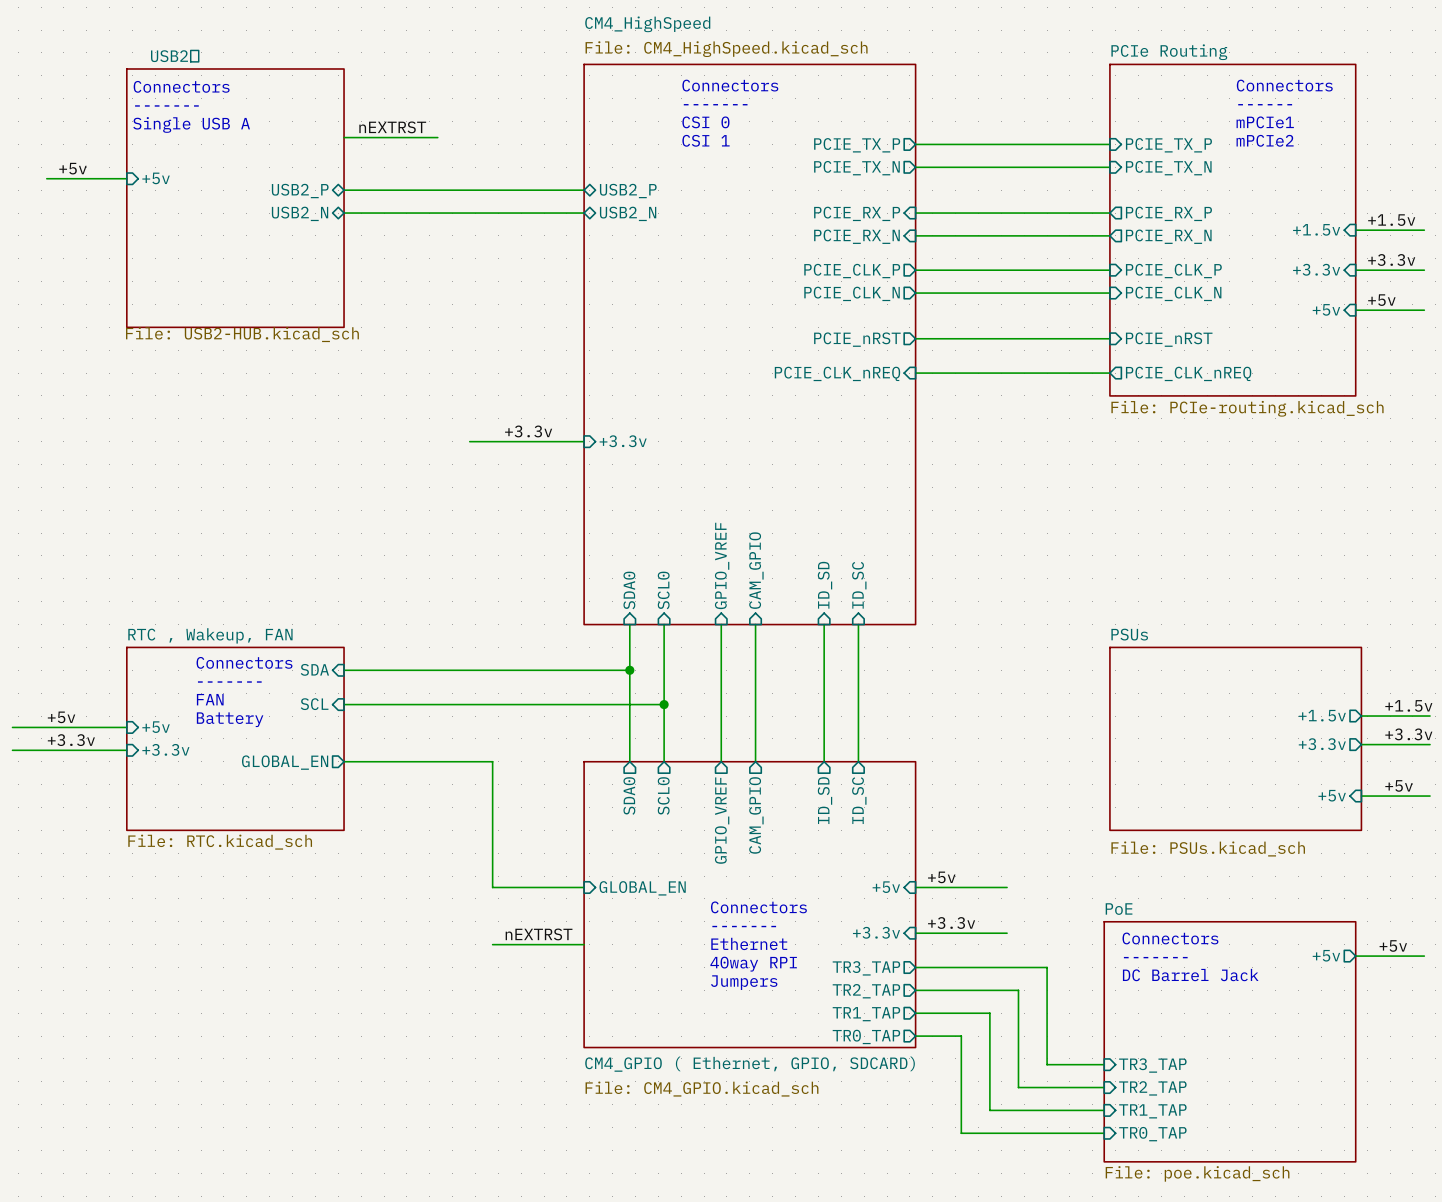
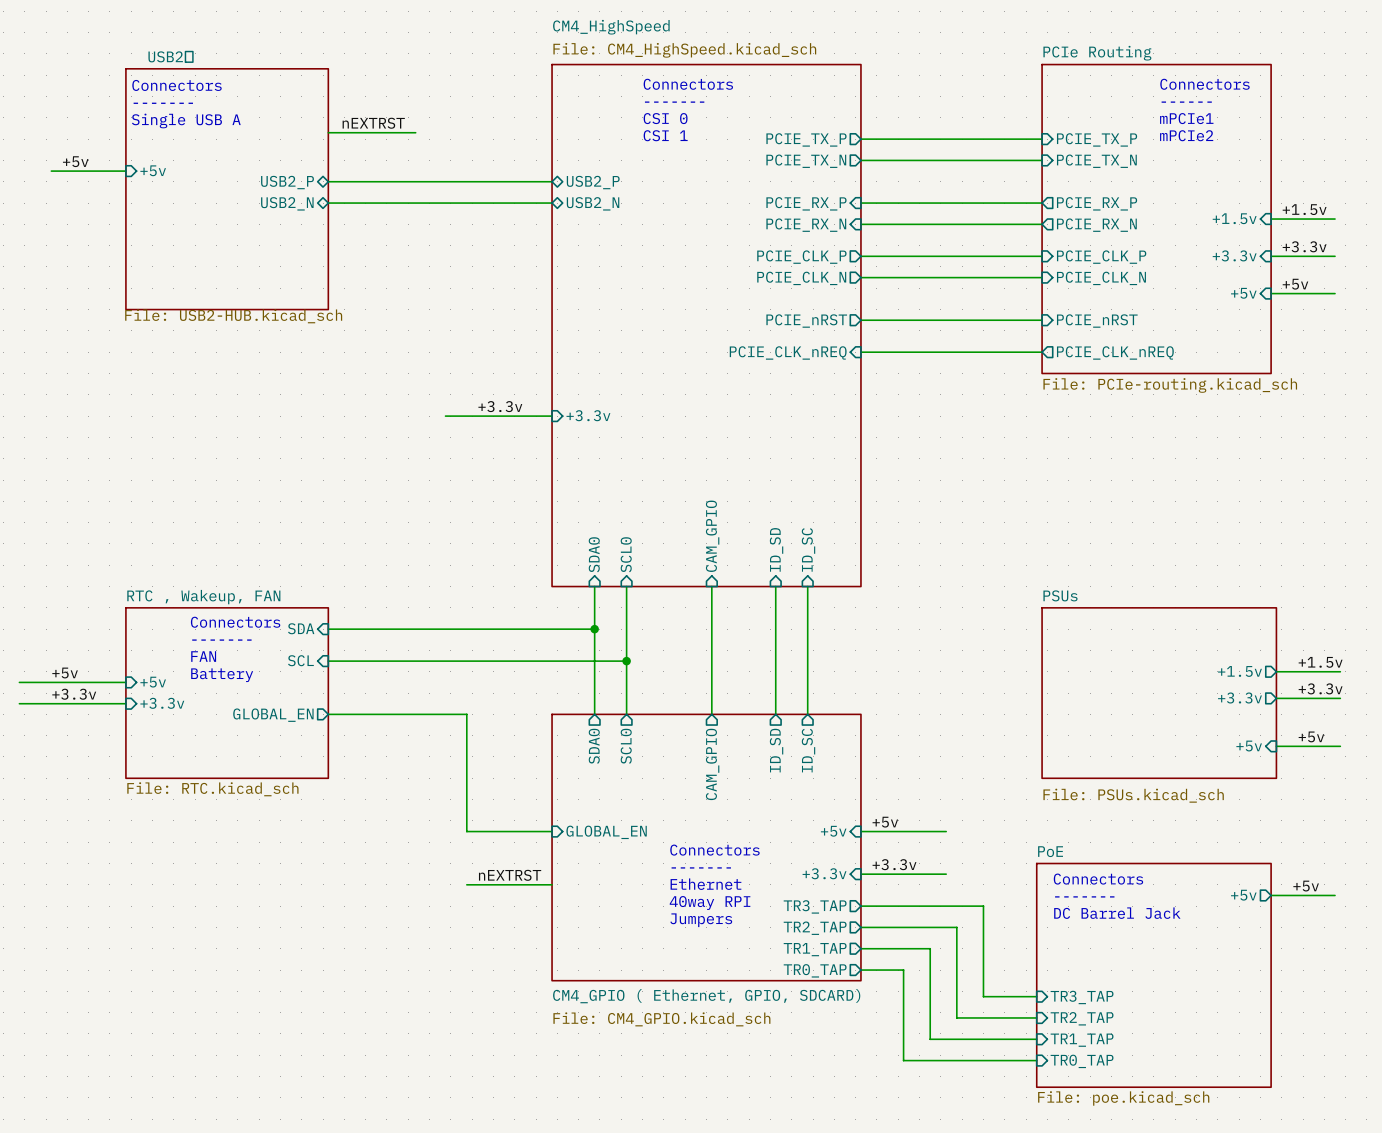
sheet pin: GPIO_VREF (722, 565) -> none
wire: (721, 624) (721, 761) -> none
sheet pin: GPIO_VREF (722, 820) -> none

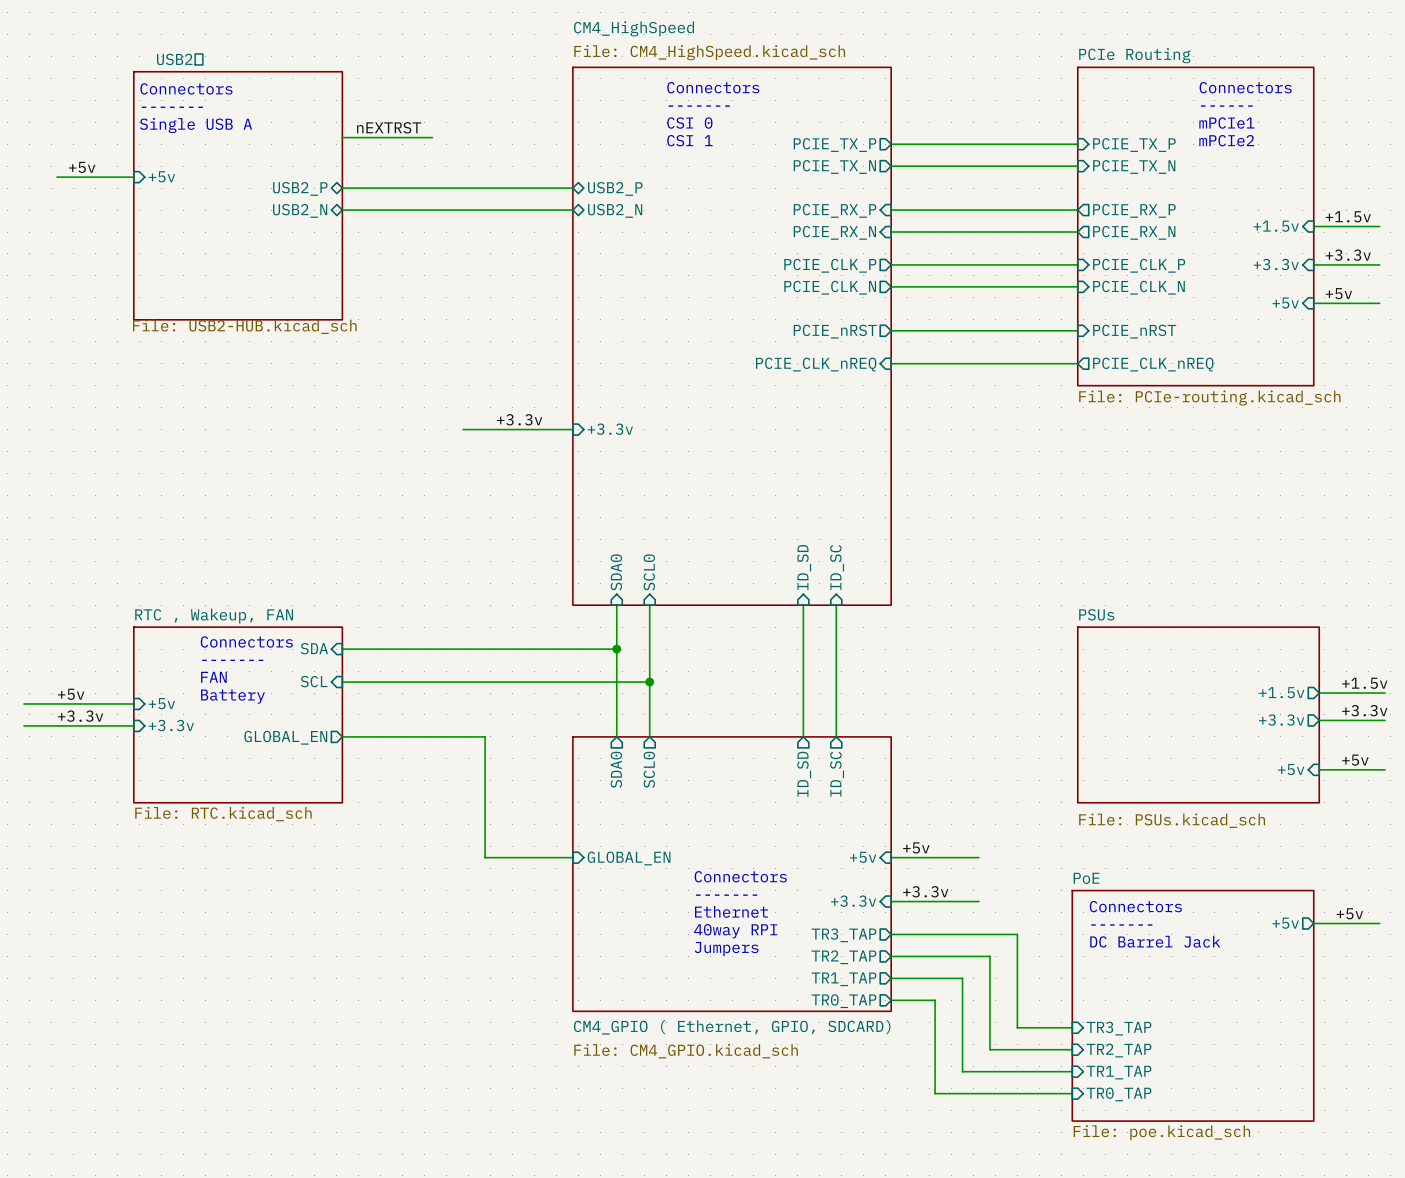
sheet pin: CAM_GPIO (712, 536) -> none
wire: (711, 586) (711, 714) -> none
sheet pin: CAM_GPIO (712, 764) -> none
label: nEXTRST (510, 875) -> none
wire: (466, 884) (552, 884) -> none

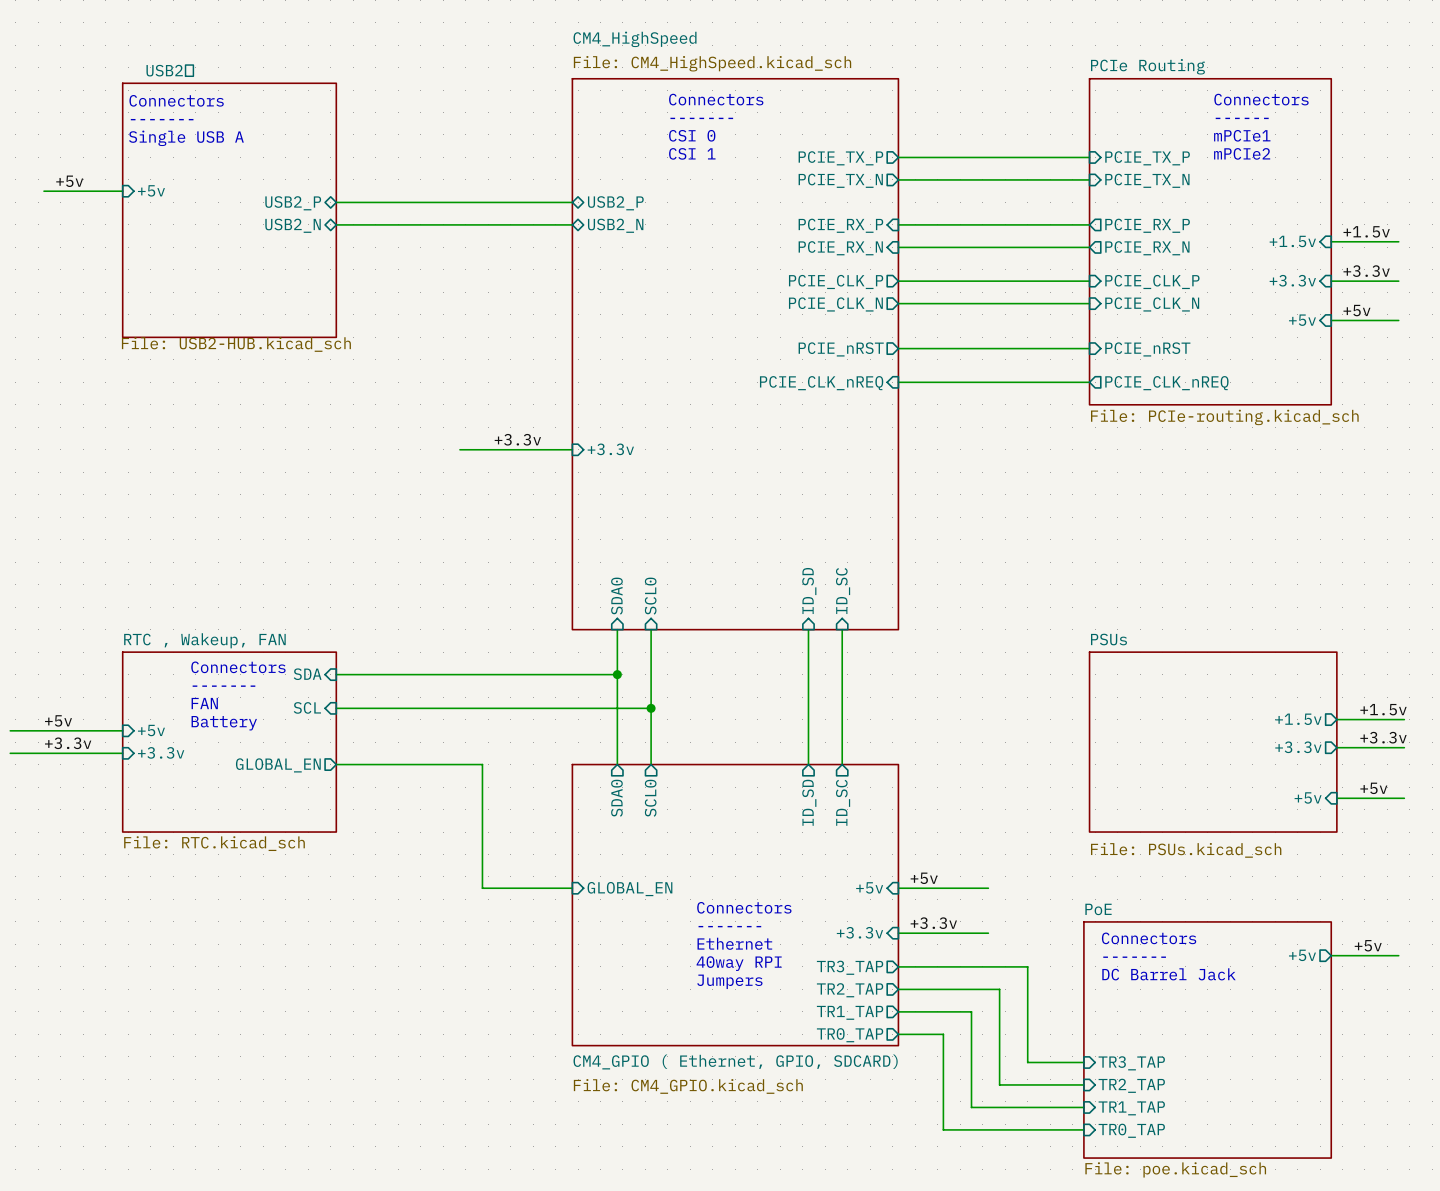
label: nEXTRST (389, 127) -> none
wire: (342, 137) (432, 137) -> none

